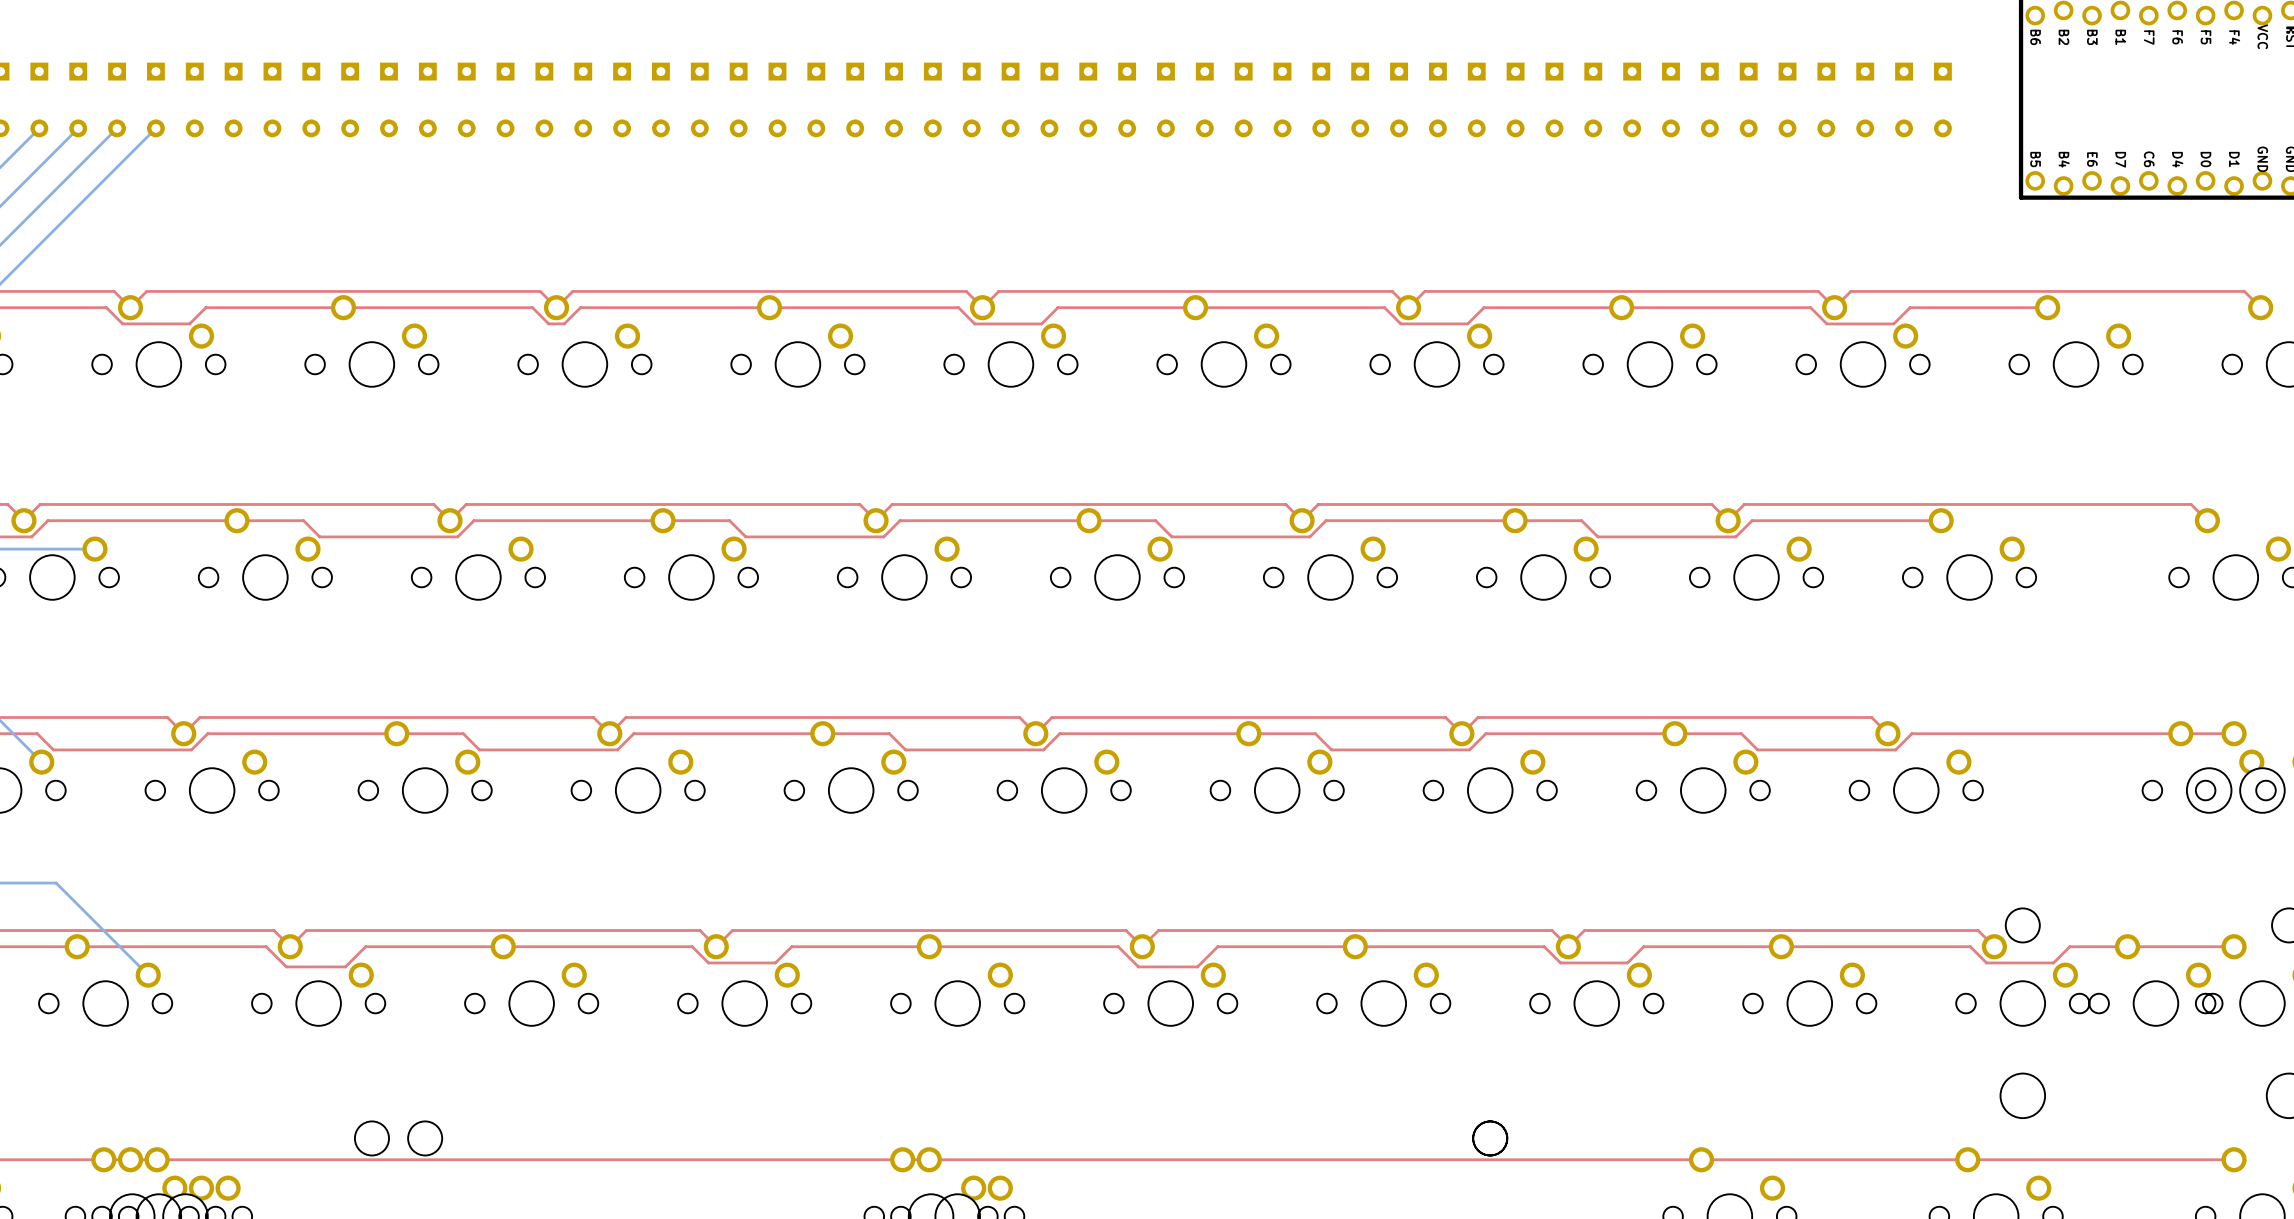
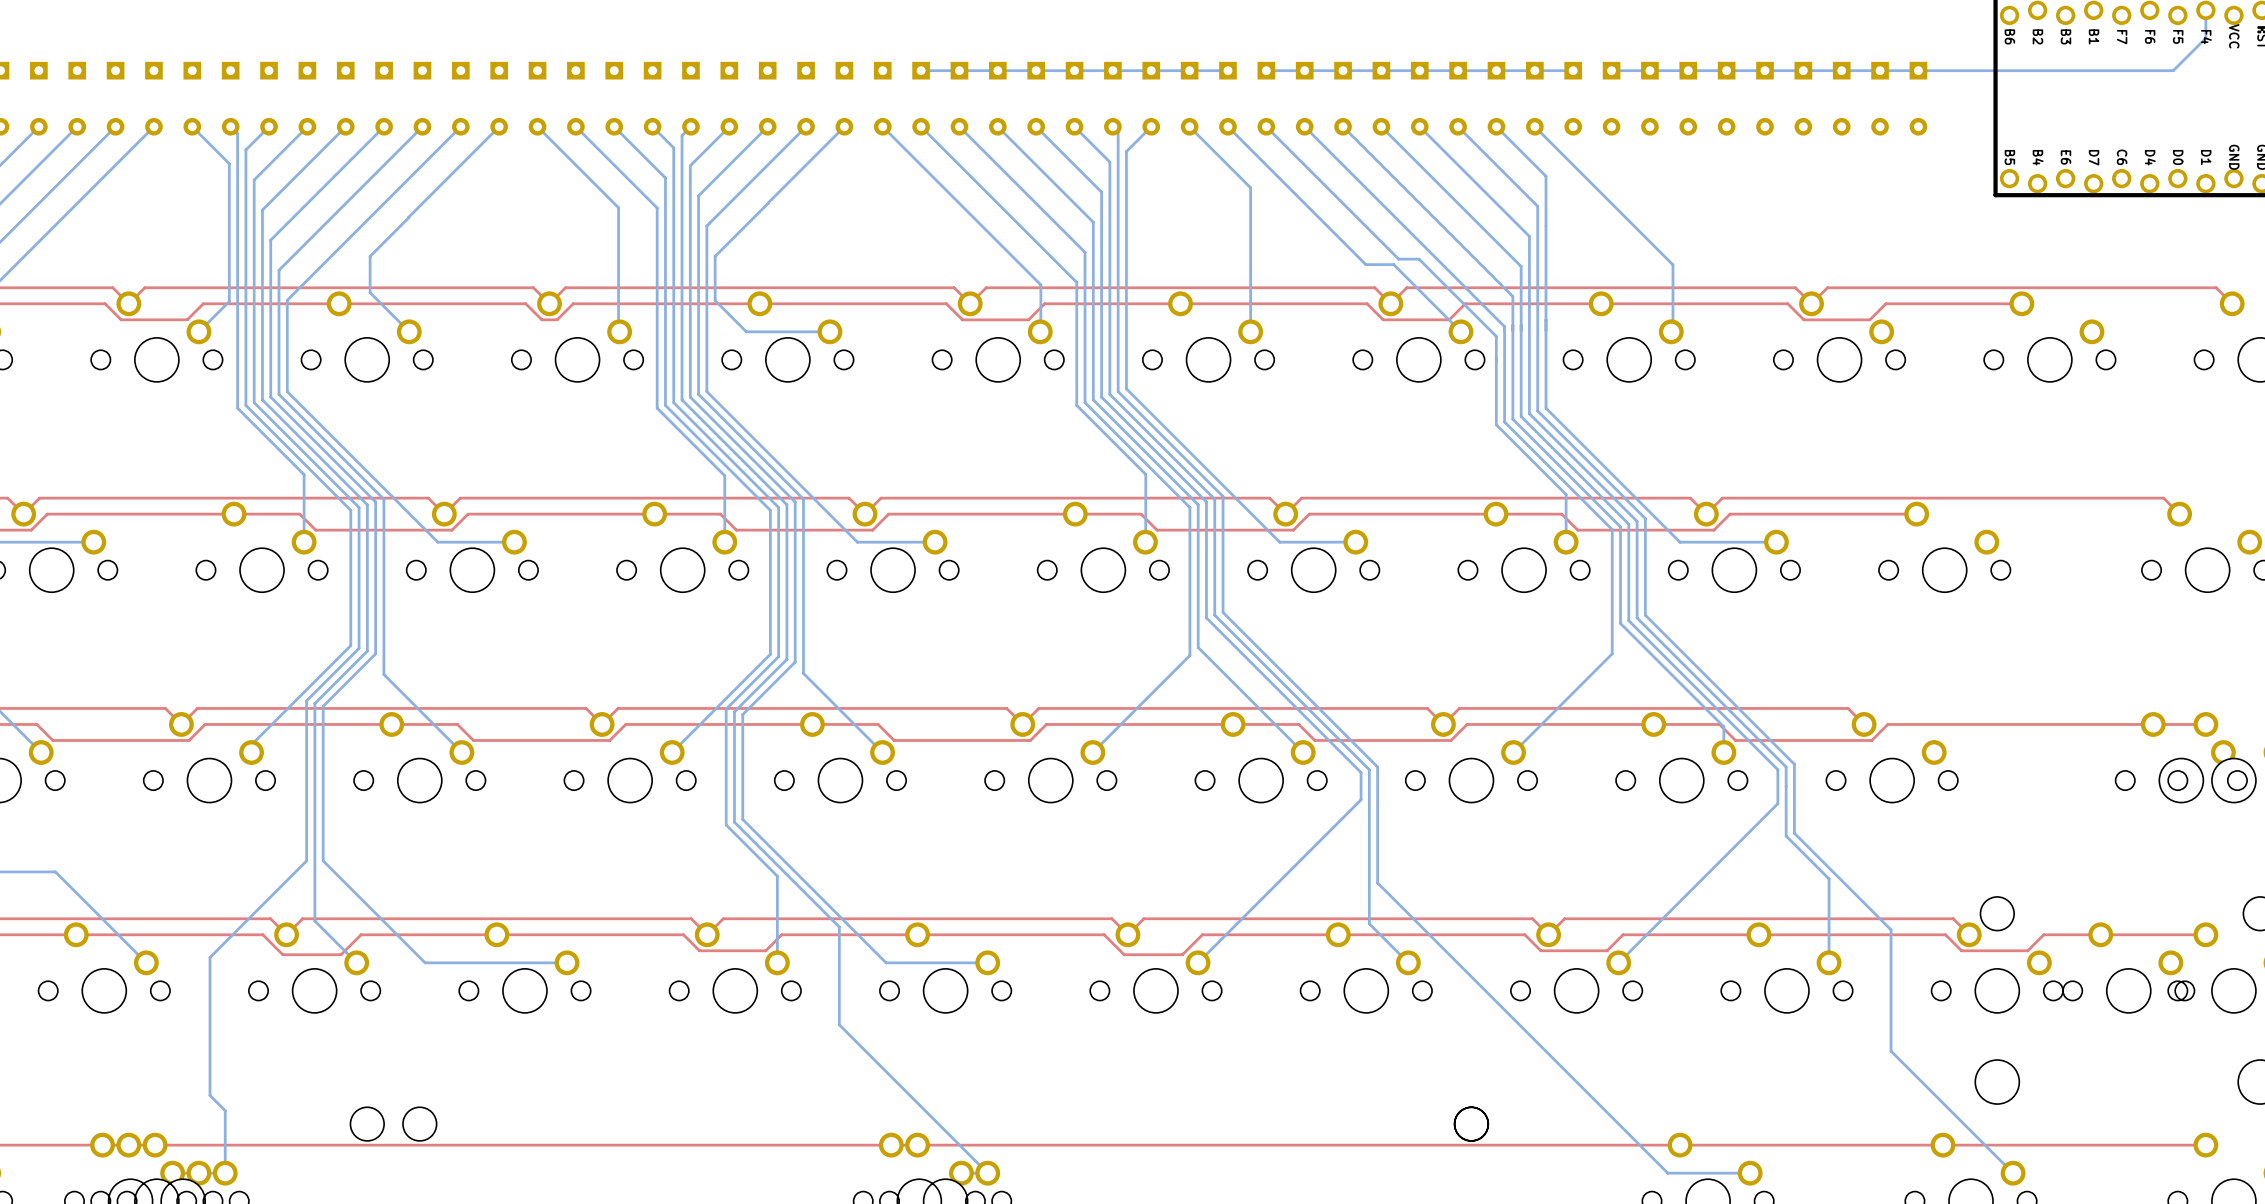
bottom track: none -> (2205, 10) (2205, 38) (2173, 70) (1611, 70)
bottom track: none -> (1227, 70) (921, 70)
bottom track: none -> (1573, 70) (1266, 70)
bottom track: none -> (192, 126) (229, 163) (229, 301) (198, 331) (192, 325)
bottom track: none -> (230, 126) (237, 133) (237, 408) (304, 474) (304, 542)
bottom track: none -> (269, 126) (245, 149) (245, 405) (350, 510) (350, 645) (251, 744) (251, 752)
bottom track: none -> (307, 126) (254, 179) (254, 402) (359, 507) (359, 648) (306, 700) (306, 860) (210, 957) (210, 1095) (225, 1110) (225, 1173) (172, 1173)
bottom track: none -> (345, 126) (262, 210) (262, 399) (367, 504) (367, 651) (314, 703) (314, 921) (356, 962)
bottom track: none -> (384, 126) (270, 240) (270, 397) (375, 502) (375, 653) (323, 706) (323, 860) (425, 962) (567, 962)
bottom track: none -> (422, 126) (279, 270) (279, 394) (383, 499) (383, 674) (461, 752)
bottom track: none -> (460, 126) (287, 300) (287, 391) (437, 542) (514, 542)
bottom track: none -> (499, 126) (370, 256) (370, 292) (409, 331)
bottom track: none -> (537, 126) (618, 207) (619, 331)
bottom track: none -> (575, 126) (657, 208) (657, 408) (724, 475) (724, 542)
bottom track: none -> (614, 126) (665, 177) (665, 405) (770, 510) (770, 654) (672, 752)
bottom track: none -> (652, 126) (673, 147) (673, 402) (778, 507) (778, 656) (726, 709) (726, 824) (777, 876) (777, 962)
bottom track: none -> (690, 126) (682, 135) (682, 399) (786, 504) (786, 659) (734, 711) (734, 822) (839, 927) (839, 1024) (987, 1173) (961, 1173)
bottom track: none -> (729, 126) (690, 165) (690, 397) (795, 502) (795, 662) (742, 714) (742, 819) (886, 962) (987, 962)
bottom track: none -> (767, 126) (698, 195) (698, 394) (803, 499) (803, 673) (882, 752)
bottom track: none -> (806, 126) (706, 226) (706, 391) (857, 542) (935, 542)
bottom track: none -> (844, 126) (715, 256) (715, 300) (746, 331) (829, 331)
bottom track: none -> (882, 126) (1040, 284) (1040, 331)
bottom track: none -> (921, 126) (1076, 282) (1076, 405) (1145, 474) (1145, 542)
bottom track: none -> (959, 126) (1085, 252) (1085, 402) (1189, 507) (1189, 655) (1092, 752)
bottom track: none -> (997, 126) (1093, 222) (1093, 399) (1198, 504) (1198, 647) (1303, 752)
bottom track: none -> (1036, 126) (1101, 192) (1101, 397) (1206, 502) (1206, 617) (1361, 772) (1361, 799) (1198, 962)
bottom track: none -> (1074, 126) (1109, 162) (1109, 394) (1214, 499) (1214, 615) (1369, 769) (1369, 923) (1408, 962)
bottom track: none -> (1112, 126) (1118, 132) (1118, 391) (1223, 496) (1223, 612) (1377, 767) (1377, 882) (1667, 1173) (1750, 1173)
bottom track: none -> (1151, 126) (1126, 151) (1126, 388) (1279, 542) (1355, 542)
bottom track: none -> (1189, 126) (1250, 187) (1250, 331)
bottom track: none -> (1227, 126) (1365, 264) (1393, 264) (1460, 331)
bottom track: none -> (1266, 126) (1398, 259) (1419, 259) (1496, 336) (1496, 424) (1566, 494) (1566, 542)
bottom track: none -> (1304, 126) (1504, 326) (1504, 421) (1612, 529) (1612, 653) (1513, 752)
bottom track: none -> (1343, 126) (1512, 296) (1512, 419) (1620, 526) (1620, 623) (1723, 726) (1723, 752)
bottom track: none -> (1381, 126) (1521, 266) (1521, 416) (1628, 524) (1628, 620) (1777, 769) (1777, 803) (1618, 962)
bottom track: none -> (1419, 126) (1529, 236) (1529, 413) (1637, 521) (1637, 617) (1786, 767) (1786, 836) (1829, 878) (1829, 962)
bottom track: none -> (1458, 126) (1537, 206) (1537, 410) (1645, 518) (1645, 615) (1794, 764) (1794, 833) (1891, 929) (1891, 1051) (2013, 1173)
bottom track: none -> (1496, 126) (1545, 176) (1545, 408) (1679, 542) (1776, 542)
bottom track: none -> (1534, 126) (1672, 264) (1672, 330) (1671, 331)

